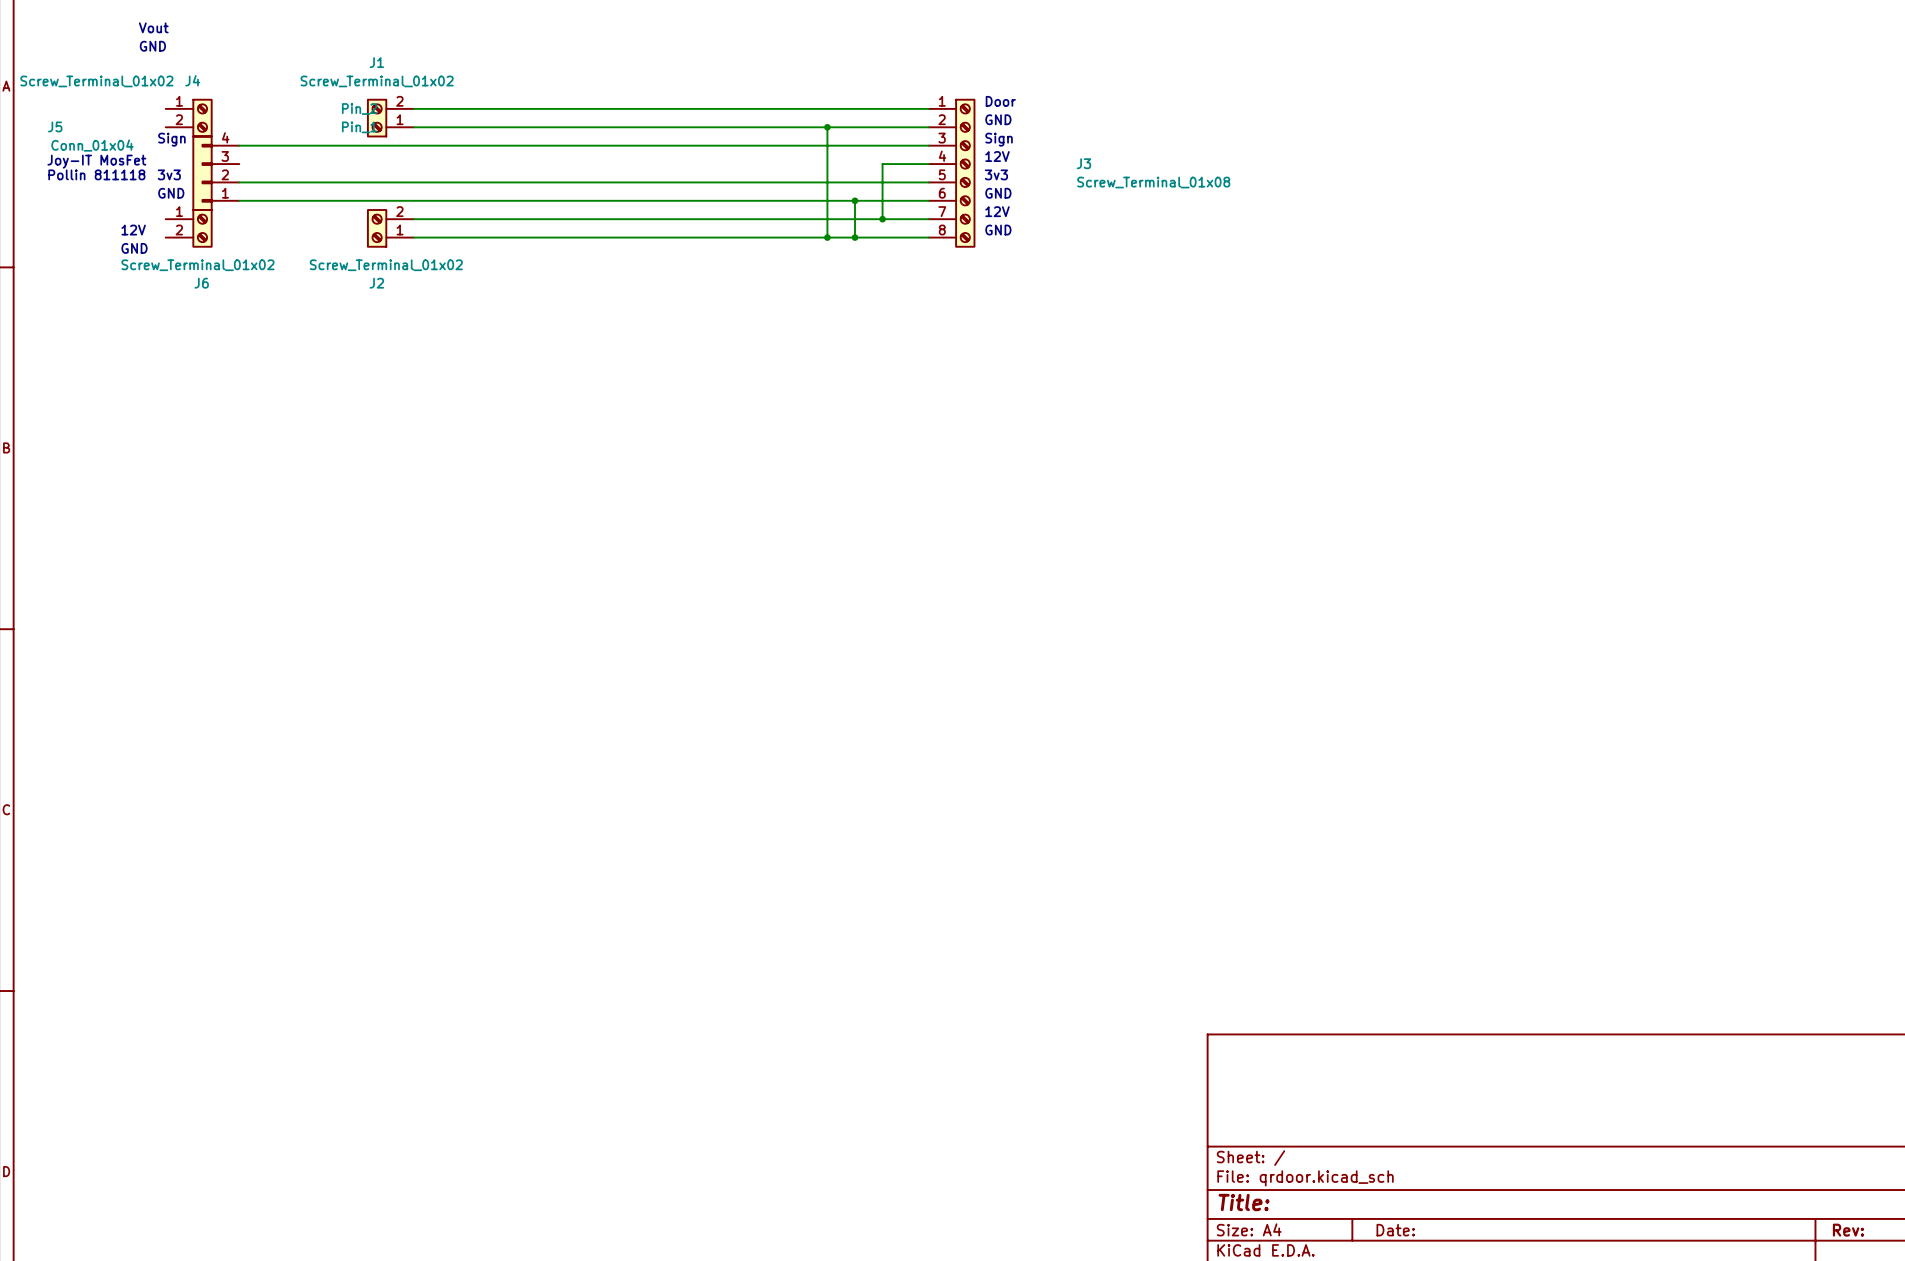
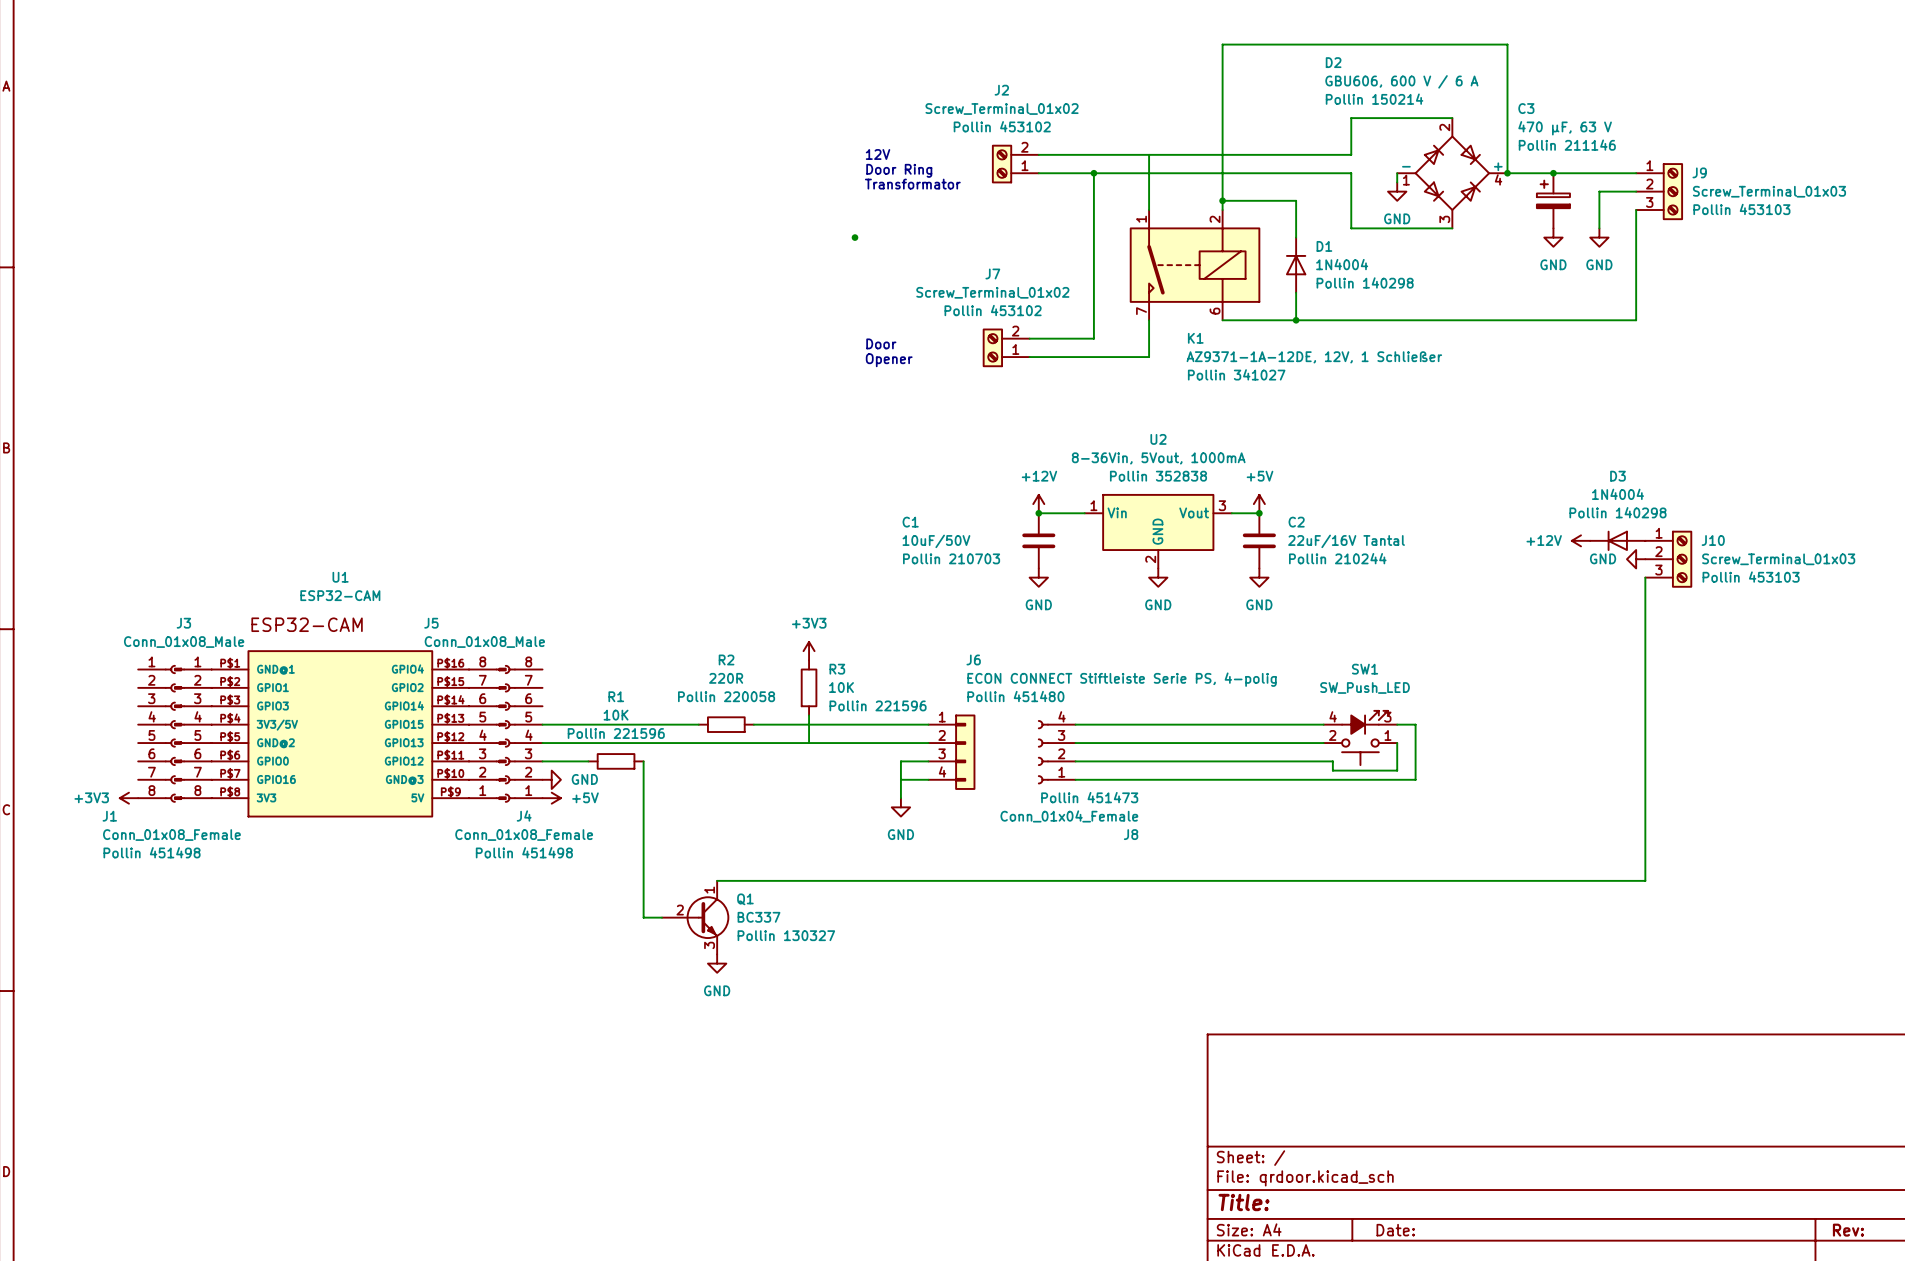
text: Vout (153, 27) -> none
text: GND (152, 46) -> none
J1 name position: J1 (376, 62) -> J1 (109, 816)
J4 name position: J4 (192, 80) -> J4 (524, 815)
J4 value: Screw_Terminal_01x02 (96, 81) -> Conn_01x08_Female (524, 835)
J1 value: Screw_Terminal_01x02 (377, 81) -> Conn_01x08_Female (171, 835)
J4 symbol: [165, 98, 213, 138] -> [505, 665, 543, 803]
J1 symbol: [367, 98, 414, 138] -> [138, 665, 176, 803]
J3 symbol: [928, 98, 976, 248] -> [174, 668, 212, 800]
text: Door (1000, 101) -> none
wire: (413, 108) (928, 108) -> none
wire: none -> (1452, 118) (1351, 118) (1351, 154) (1038, 154)
text: GND (998, 119) -> none
J5 name position: J5 (55, 126) -> J5 (431, 623)
J2 text: none -> Pollin 453102 (1002, 126)
wire: (413, 127) (928, 127) -> none
wire: (827, 127) (827, 237) -> none
junction: (827, 127) -> none
J5 symbol: [192, 135, 240, 211] -> [469, 668, 507, 800]
text: Sign (171, 139) -> none
text: Sign (999, 139) -> none
J5 value: Conn_01x04 (92, 145) -> Conn_01x08_Male (484, 642)
wire: (239, 145) (928, 145) -> none
text: none -> 12V (878, 154)
wire: none -> (1149, 154) (1149, 210)
text: 12V (997, 156) -> none
text: Joy-IT MosFet (96, 161) -> none
J3 name position: J3 (1083, 163) -> J3 (183, 623)
wire: (928, 164) (882, 164) (882, 219) -> none
text: none -> Door Ring (899, 170)
wire: none -> (1038, 173) (1351, 173) (1351, 228) (1452, 228)
wire: none -> (1093, 173) (1093, 338) (1029, 338)
junction: none -> (1093, 173)
wire: none -> (1397, 173) (1397, 182)
D2: none -> GBU606, 600 V / 6 A (1452, 173)
junction: none -> (1507, 173)
junction: none -> (1553, 173)
wire: none -> (1636, 173) (1507, 173) (1507, 44) (1222, 44) (1222, 210)
text: Pollin 811118 (96, 174) -> none
text: 3v3 (169, 174) -> none
text: 3v3 (996, 174) -> none
wire: (239, 182) (928, 182) -> none
J3 value: Screw_Terminal_01x08 (1153, 182) -> Conn_01x08_Male (184, 642)
text: none -> Transformator (912, 184)
power symbol: none -> GND (1397, 191)
wire: none -> (1636, 191) (1599, 191) (1599, 228)
J9: none -> Screw_Terminal_01x03 (1659, 191)
text: GND (171, 193) -> none
text: GND (998, 193) -> none
wire: (239, 200) (928, 200) -> none
wire: (854, 200) (854, 237) -> none
junction: (854, 200) -> none
wire: none -> (1222, 200) (1296, 200) (1296, 237)
junction: none -> (1222, 200)
C3: none -> 470 µF, 63 V (1553, 200)
J6 symbol: [165, 209, 213, 248] -> [928, 714, 976, 790]
wire: none -> (1636, 210) (1636, 320) (1222, 320)
text: 12V (997, 211) -> none
wire: (413, 219) (928, 219) -> none
junction: (882, 219) -> none
J2 position: (390, 228) -> (1015, 164)
text: 12V (133, 230) -> none
text: GND (998, 230) -> none
wire: (413, 237) (928, 237) -> none
junction: (827, 237) -> none
power symbol: none -> GND (1553, 237)
power symbol: none -> GND (1599, 237)
text: GND (134, 248) -> none
J6 value: Screw_Terminal_01x02 (197, 265) -> ECON CONNECT Stiftleiste Serie PS, 4-polig (1122, 679)
J2 value position: Screw_Terminal_01x02 (386, 265) -> Screw_Terminal_01x02 (1002, 109)
K1: none -> AZ9371-1A-12DE, 12V, 1 Schließer (1195, 265)
D1: none -> 1N4004 (1296, 265)
J6 name position: J6 (201, 283) -> J6 (973, 659)
J2 name position: J2 (376, 283) -> J2 (1001, 90)
wire: none -> (1296, 292) (1296, 320)
wire: none -> (1149, 320) (1149, 357) (1029, 357)
junction: none -> (1296, 320)
text: none -> Door (881, 343)
J7: none -> Screw_Terminal_01x02 (1006, 347)
text: none -> Opener (889, 360)
power symbol: none -> +12V (1038, 504)
power symbol: none -> +5V (1259, 504)
wire: none -> (1038, 513) (1084, 513)
junction: none -> (1038, 513)
wire: none -> (1231, 513) (1259, 513)
junction: none -> (1259, 513)
U2: none -> 8-36Vin, 5Vout, 1000mA (1158, 531)
C1: none -> 10uF/50V (1038, 540)
C2: none -> 22uF/16V Tantal (1259, 540)
power symbol: none -> +12V (1581, 540)
D3: none -> 1N4004 (1617, 540)
power symbol: none -> GND (1636, 559)
J10: none -> Screw_Terminal_01x03 (1668, 559)
power symbol: none -> GND (1038, 577)
power symbol: none -> GND (1158, 577)
power symbol: none -> GND (1259, 577)
wire: none -> (1645, 577) (1645, 880) (717, 880)
power symbol: none -> +3V3 (809, 651)
R3: none -> 10K (809, 687)
J6 text: none -> Pollin 451480 (1015, 696)
wire: none -> (809, 715) (809, 743)
wire: none -> (542, 724) (698, 724)
R2: none -> 220R (726, 724)
wire: none -> (753, 724) (928, 724)
wire: none -> (1075, 724) (1323, 724)
wire: none -> (1397, 724) (1415, 724) (1415, 779) (1075, 779)
U1: none -> ESP32-CAM (340, 733)
SW1: none -> SW_Push_LED (1360, 737)
wire: none -> (542, 743) (928, 743)
wire: none -> (1075, 743) (1323, 743)
wire: none -> (1397, 743) (1397, 770) (1332, 770) (1332, 761) (1075, 761)
J8: none -> Conn_01x04_Female (1056, 752)
wire: none -> (542, 761) (588, 761)
R1: none -> 10K (616, 761)
wire: none -> (643, 761) (643, 917) (662, 917)
wire: none -> (928, 761) (900, 761) (900, 798)
power symbol: none -> GND (551, 779)
wire: none -> (900, 779) (928, 779)
power symbol: none -> +3V3 (128, 798)
power symbol: none -> +5V (551, 798)
power symbol: none -> GND (900, 807)
J1 text: none -> Pollin 451498 (152, 852)
J4 text: none -> Pollin 451498 (524, 852)
Q1: none -> BC337 (695, 917)
power symbol: none -> GND (717, 963)

